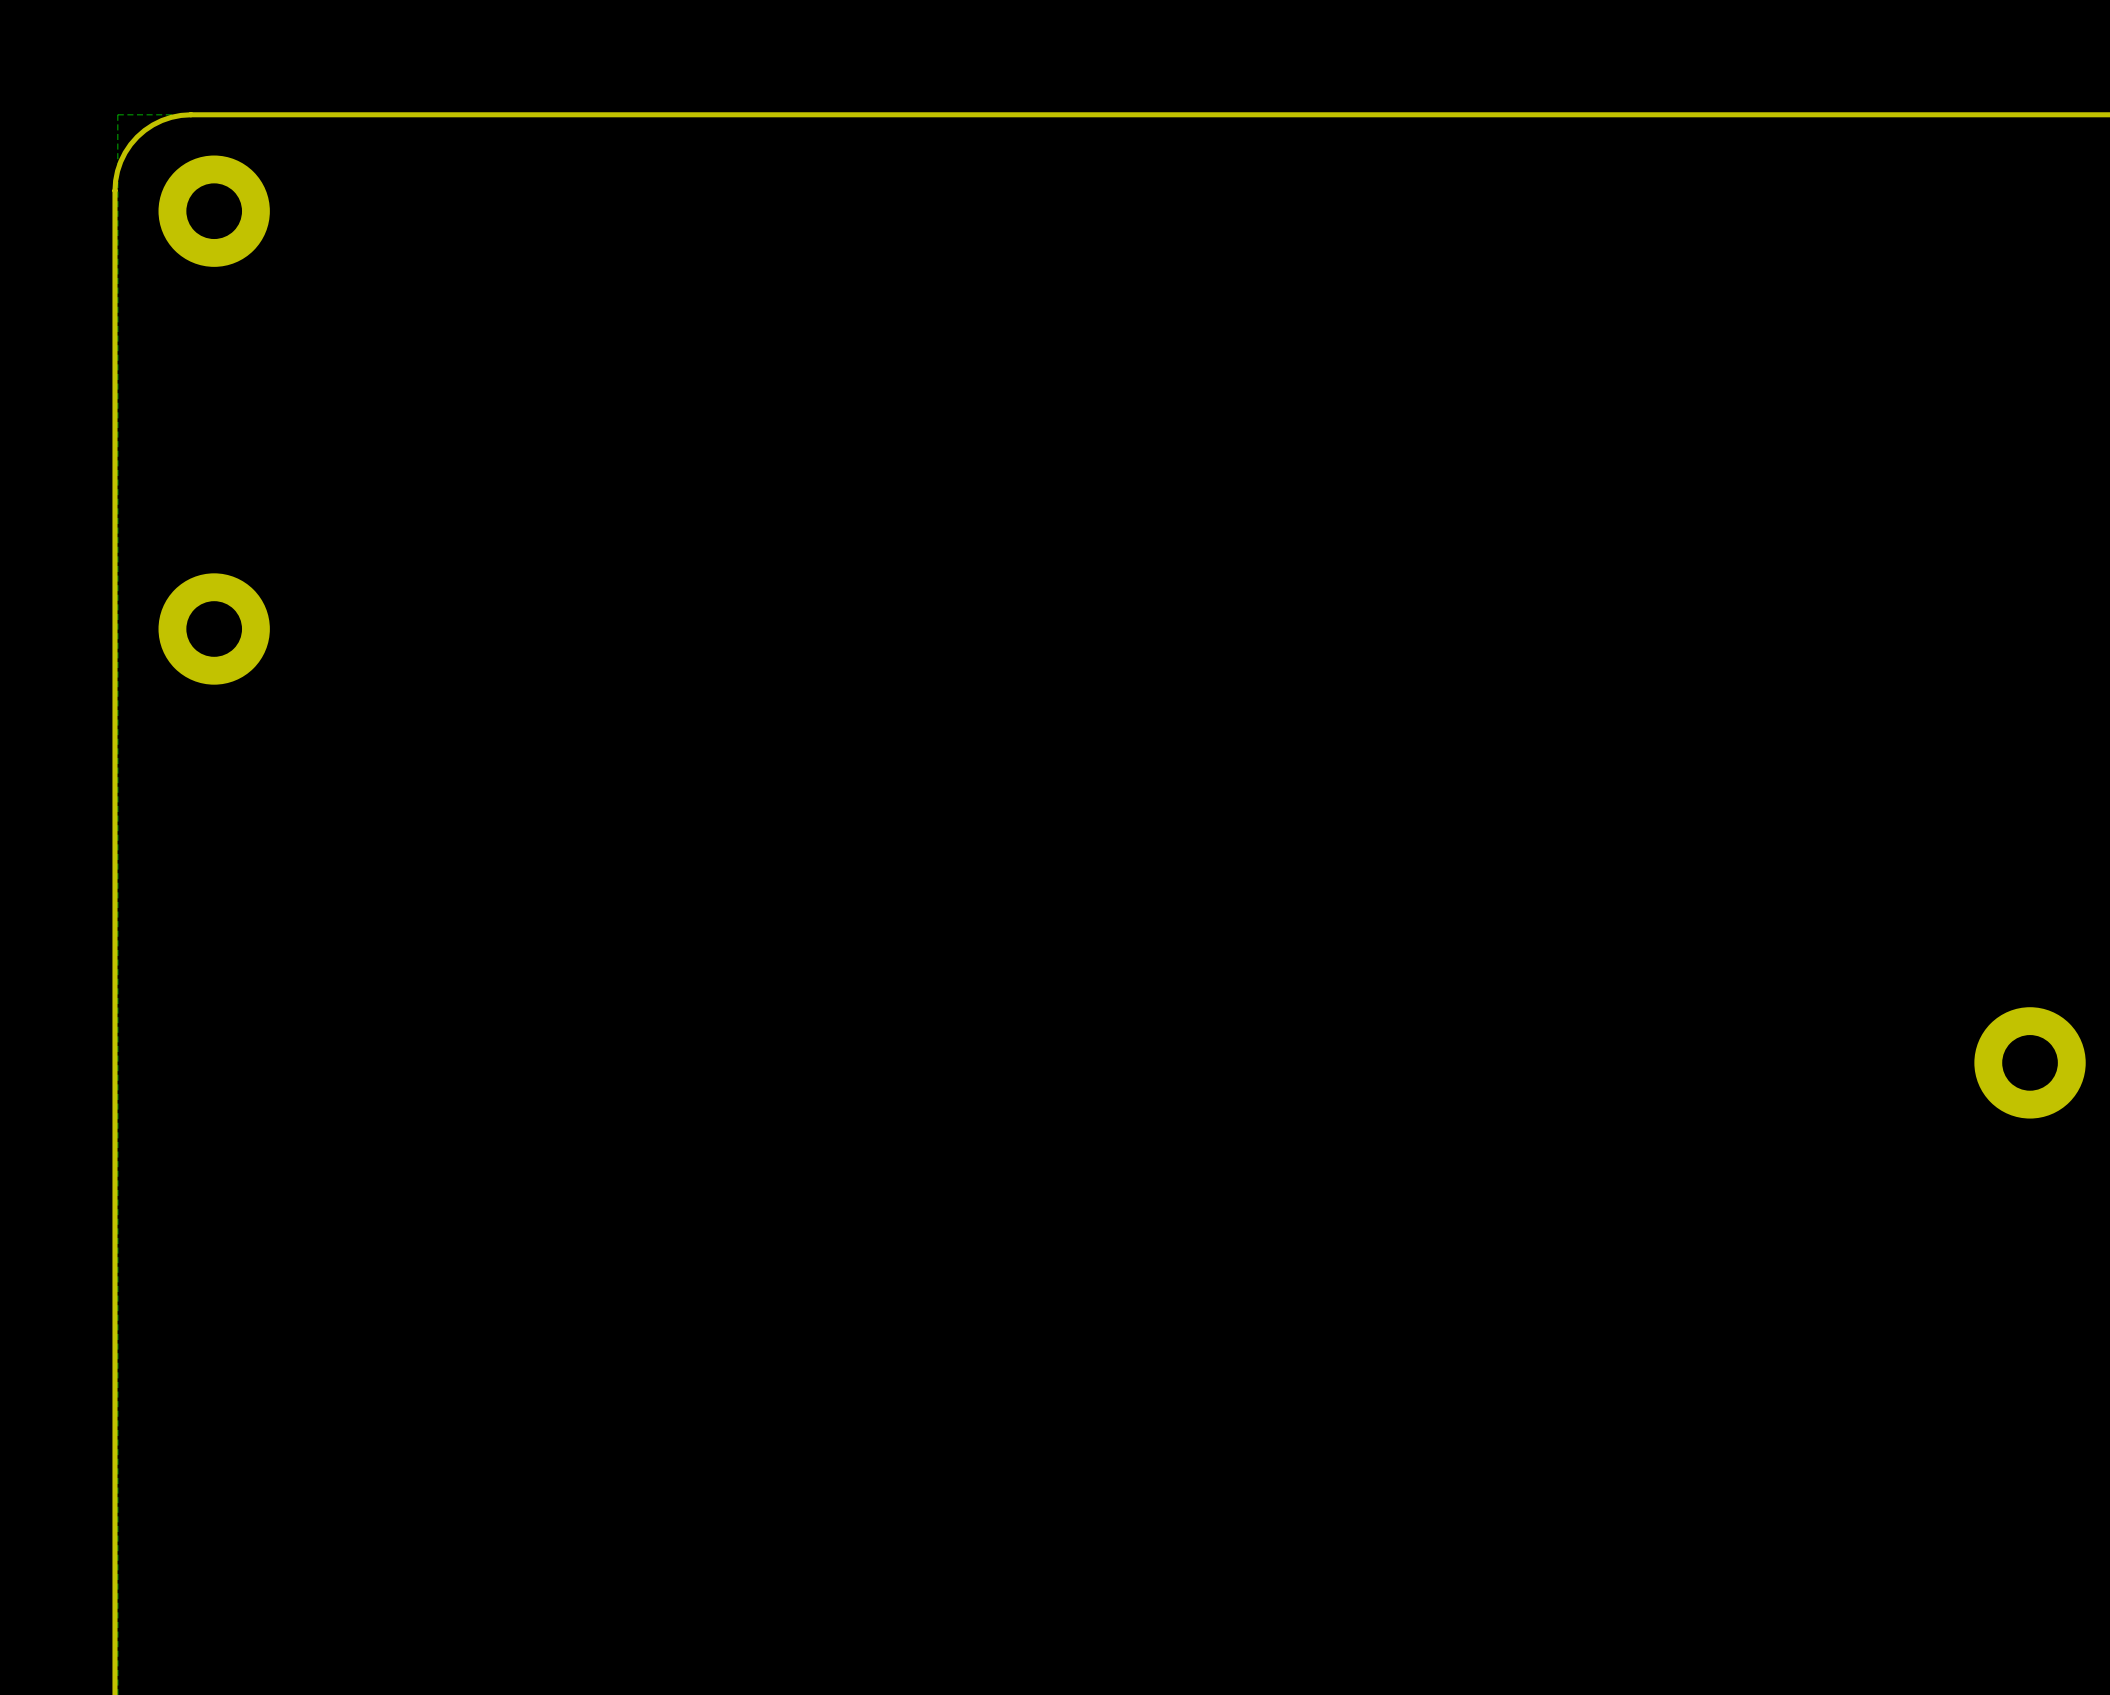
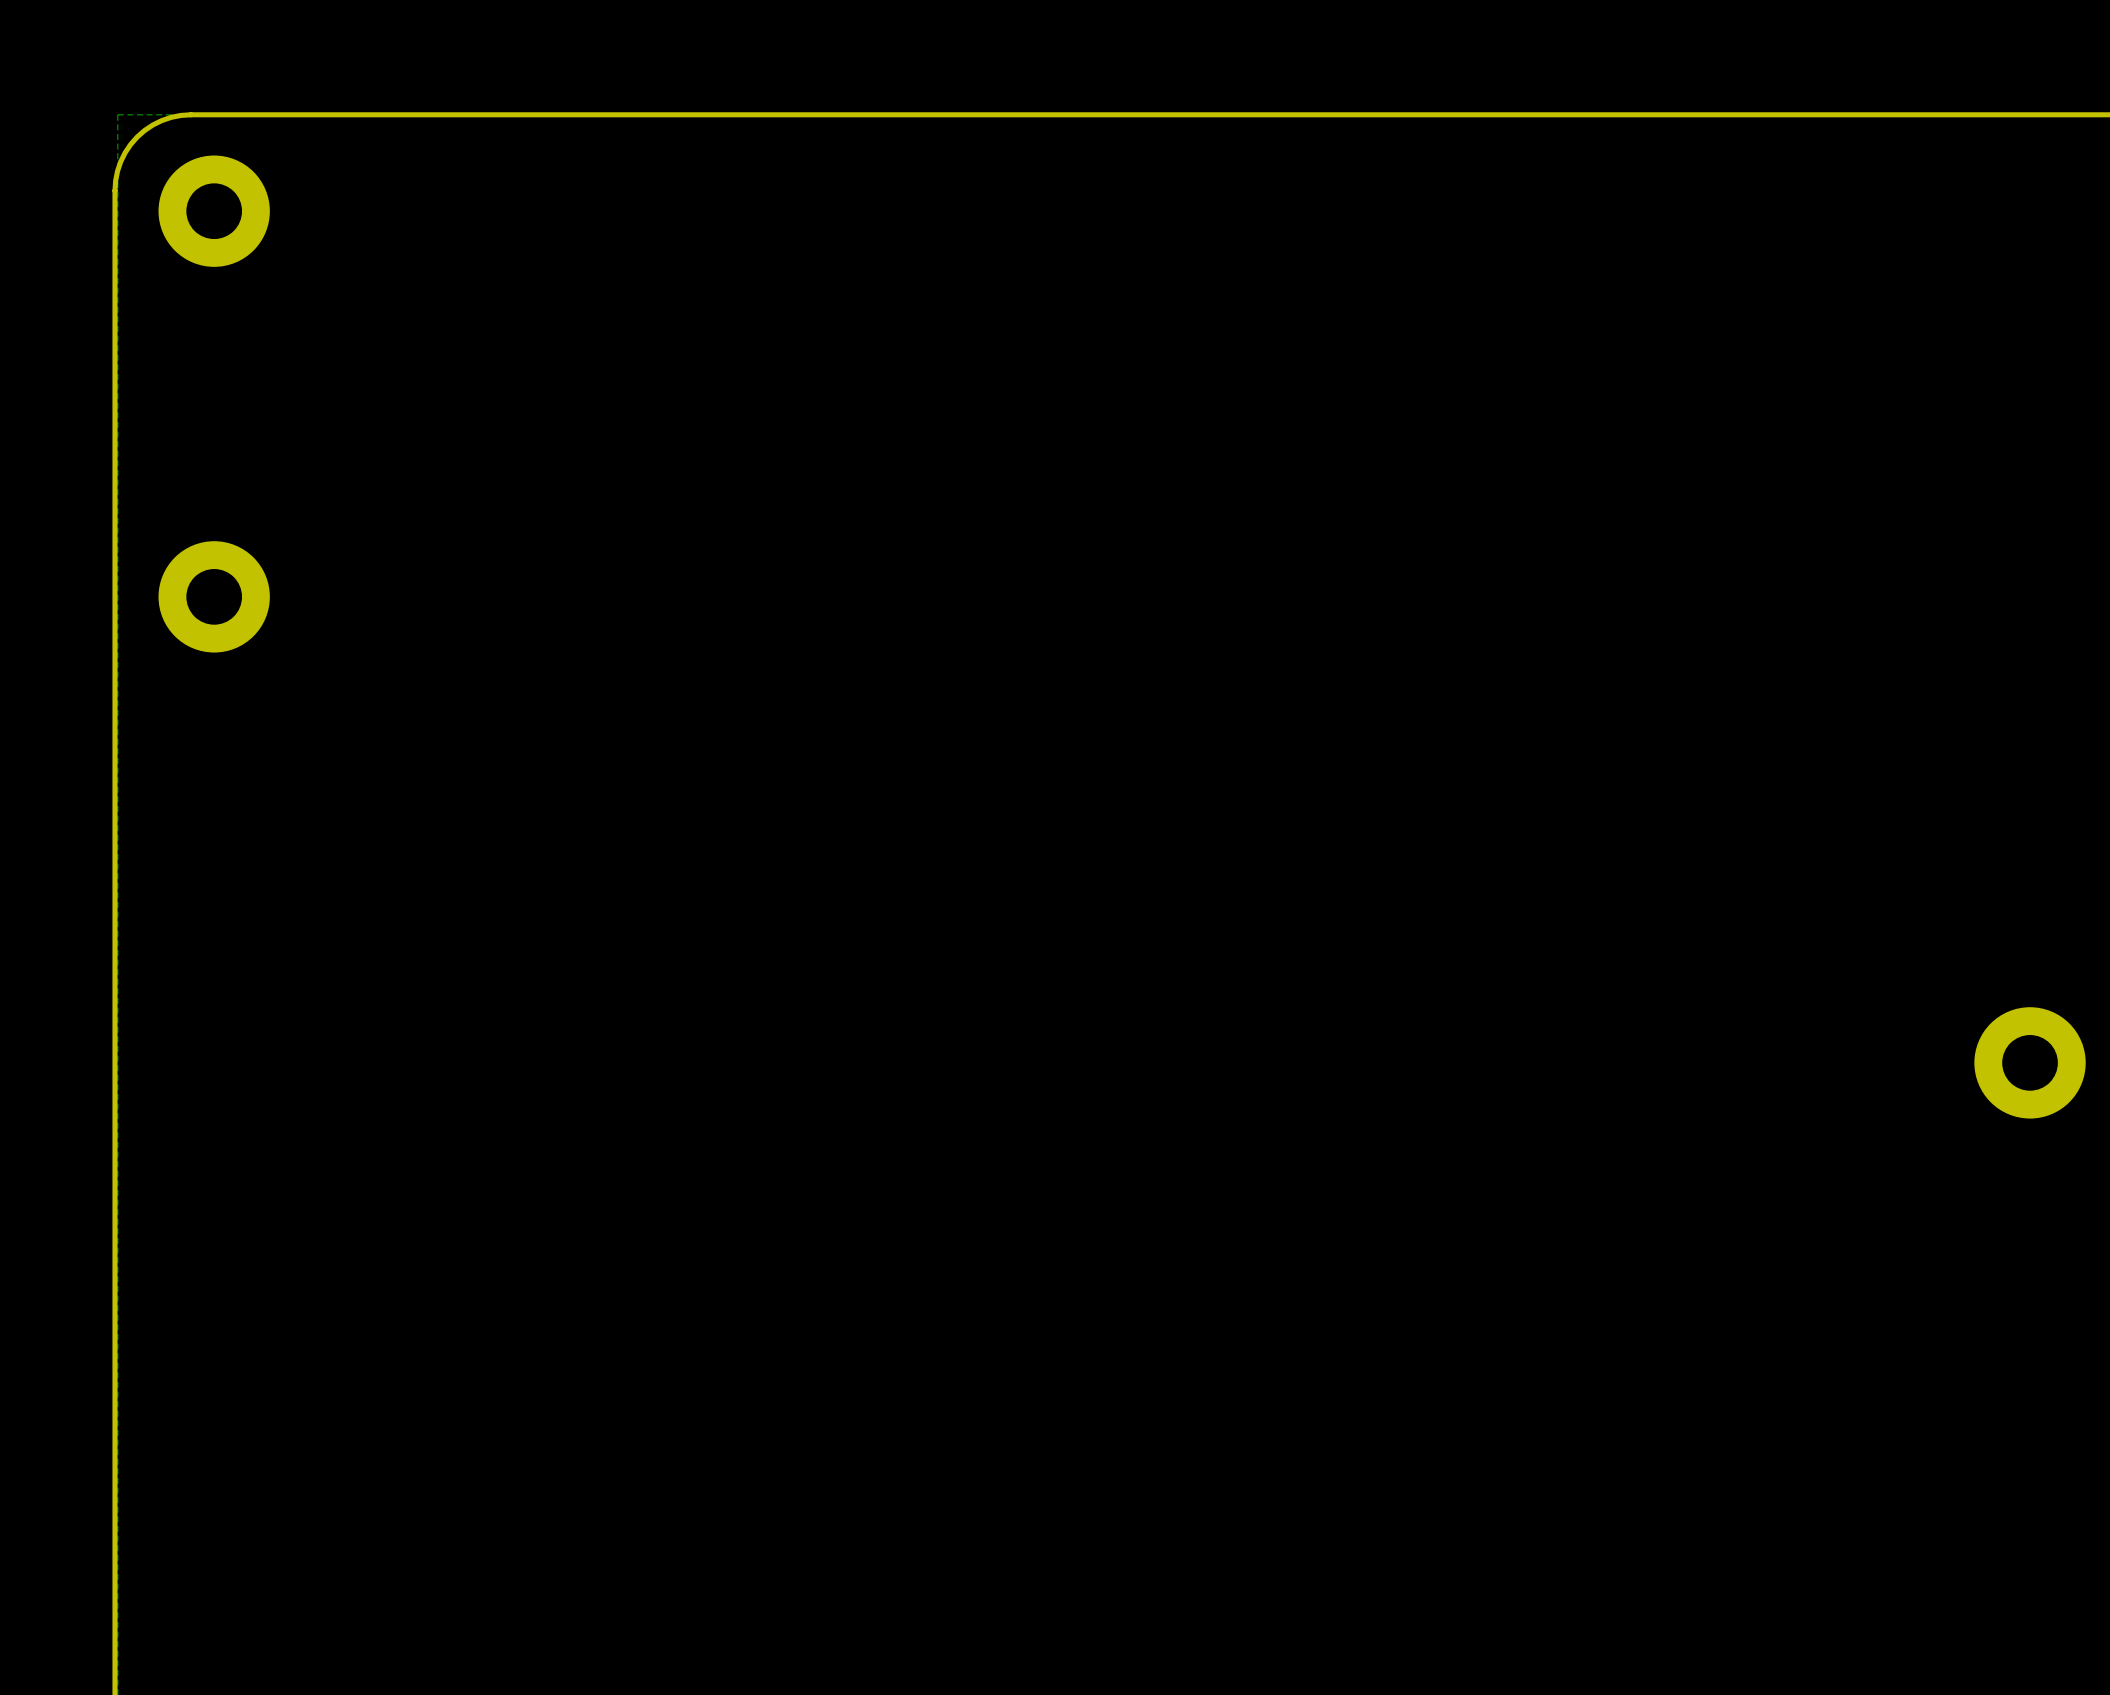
part position: (214, 629) -> (214, 596)

